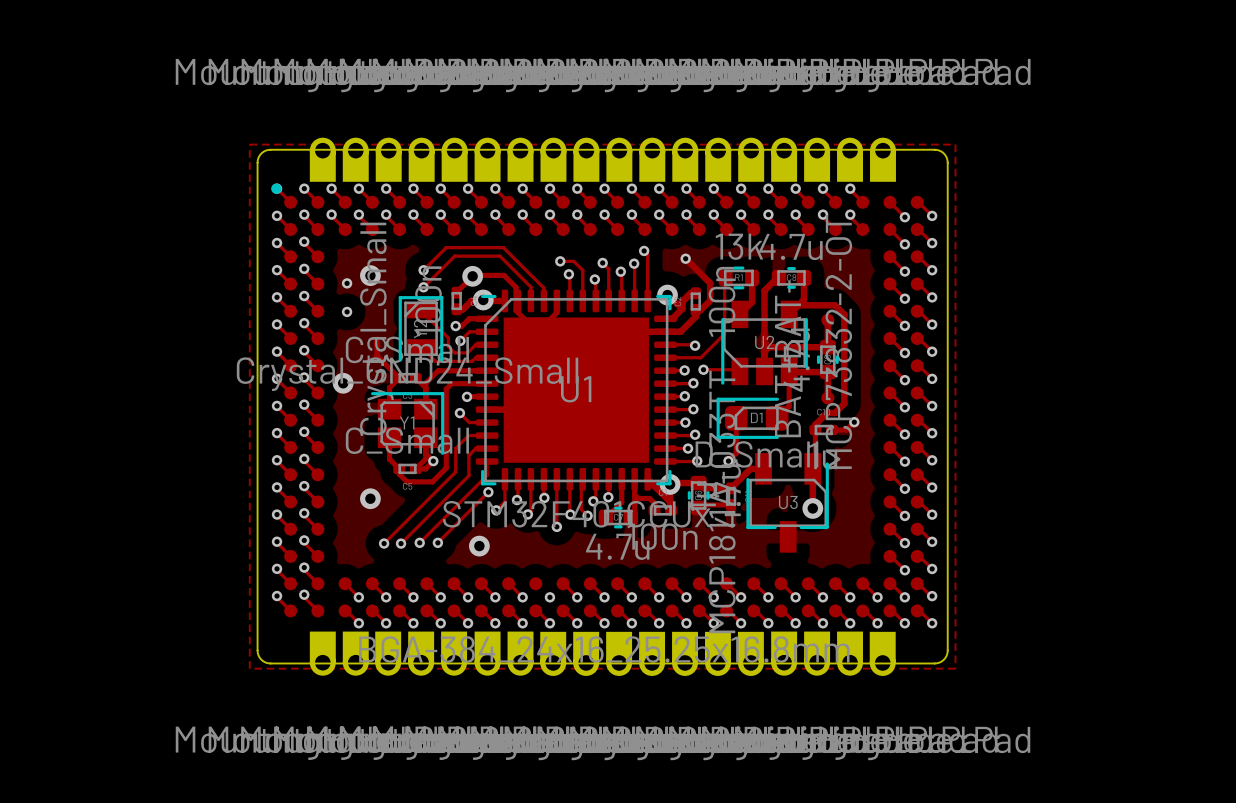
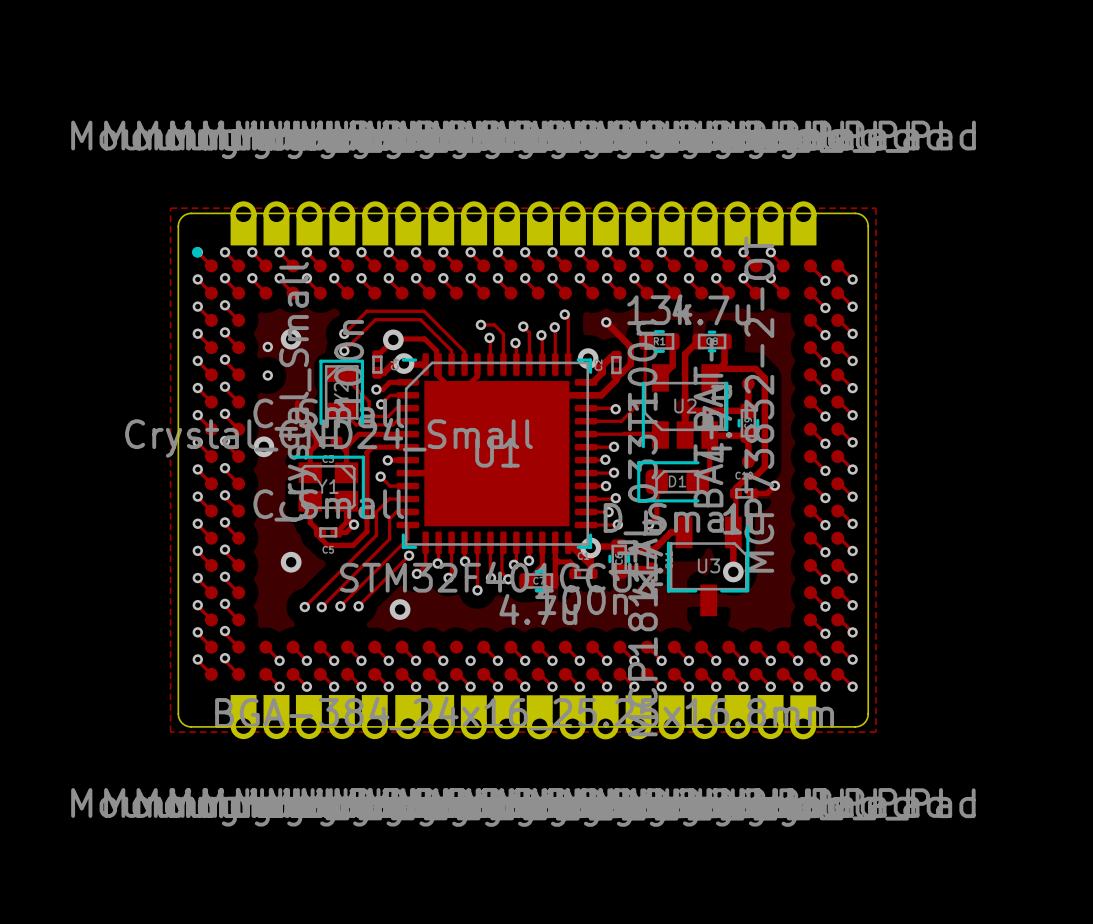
via: (703, 369) -> none
top track: none -> (604, 434) (659, 434)
via: (684, 370) -> none

